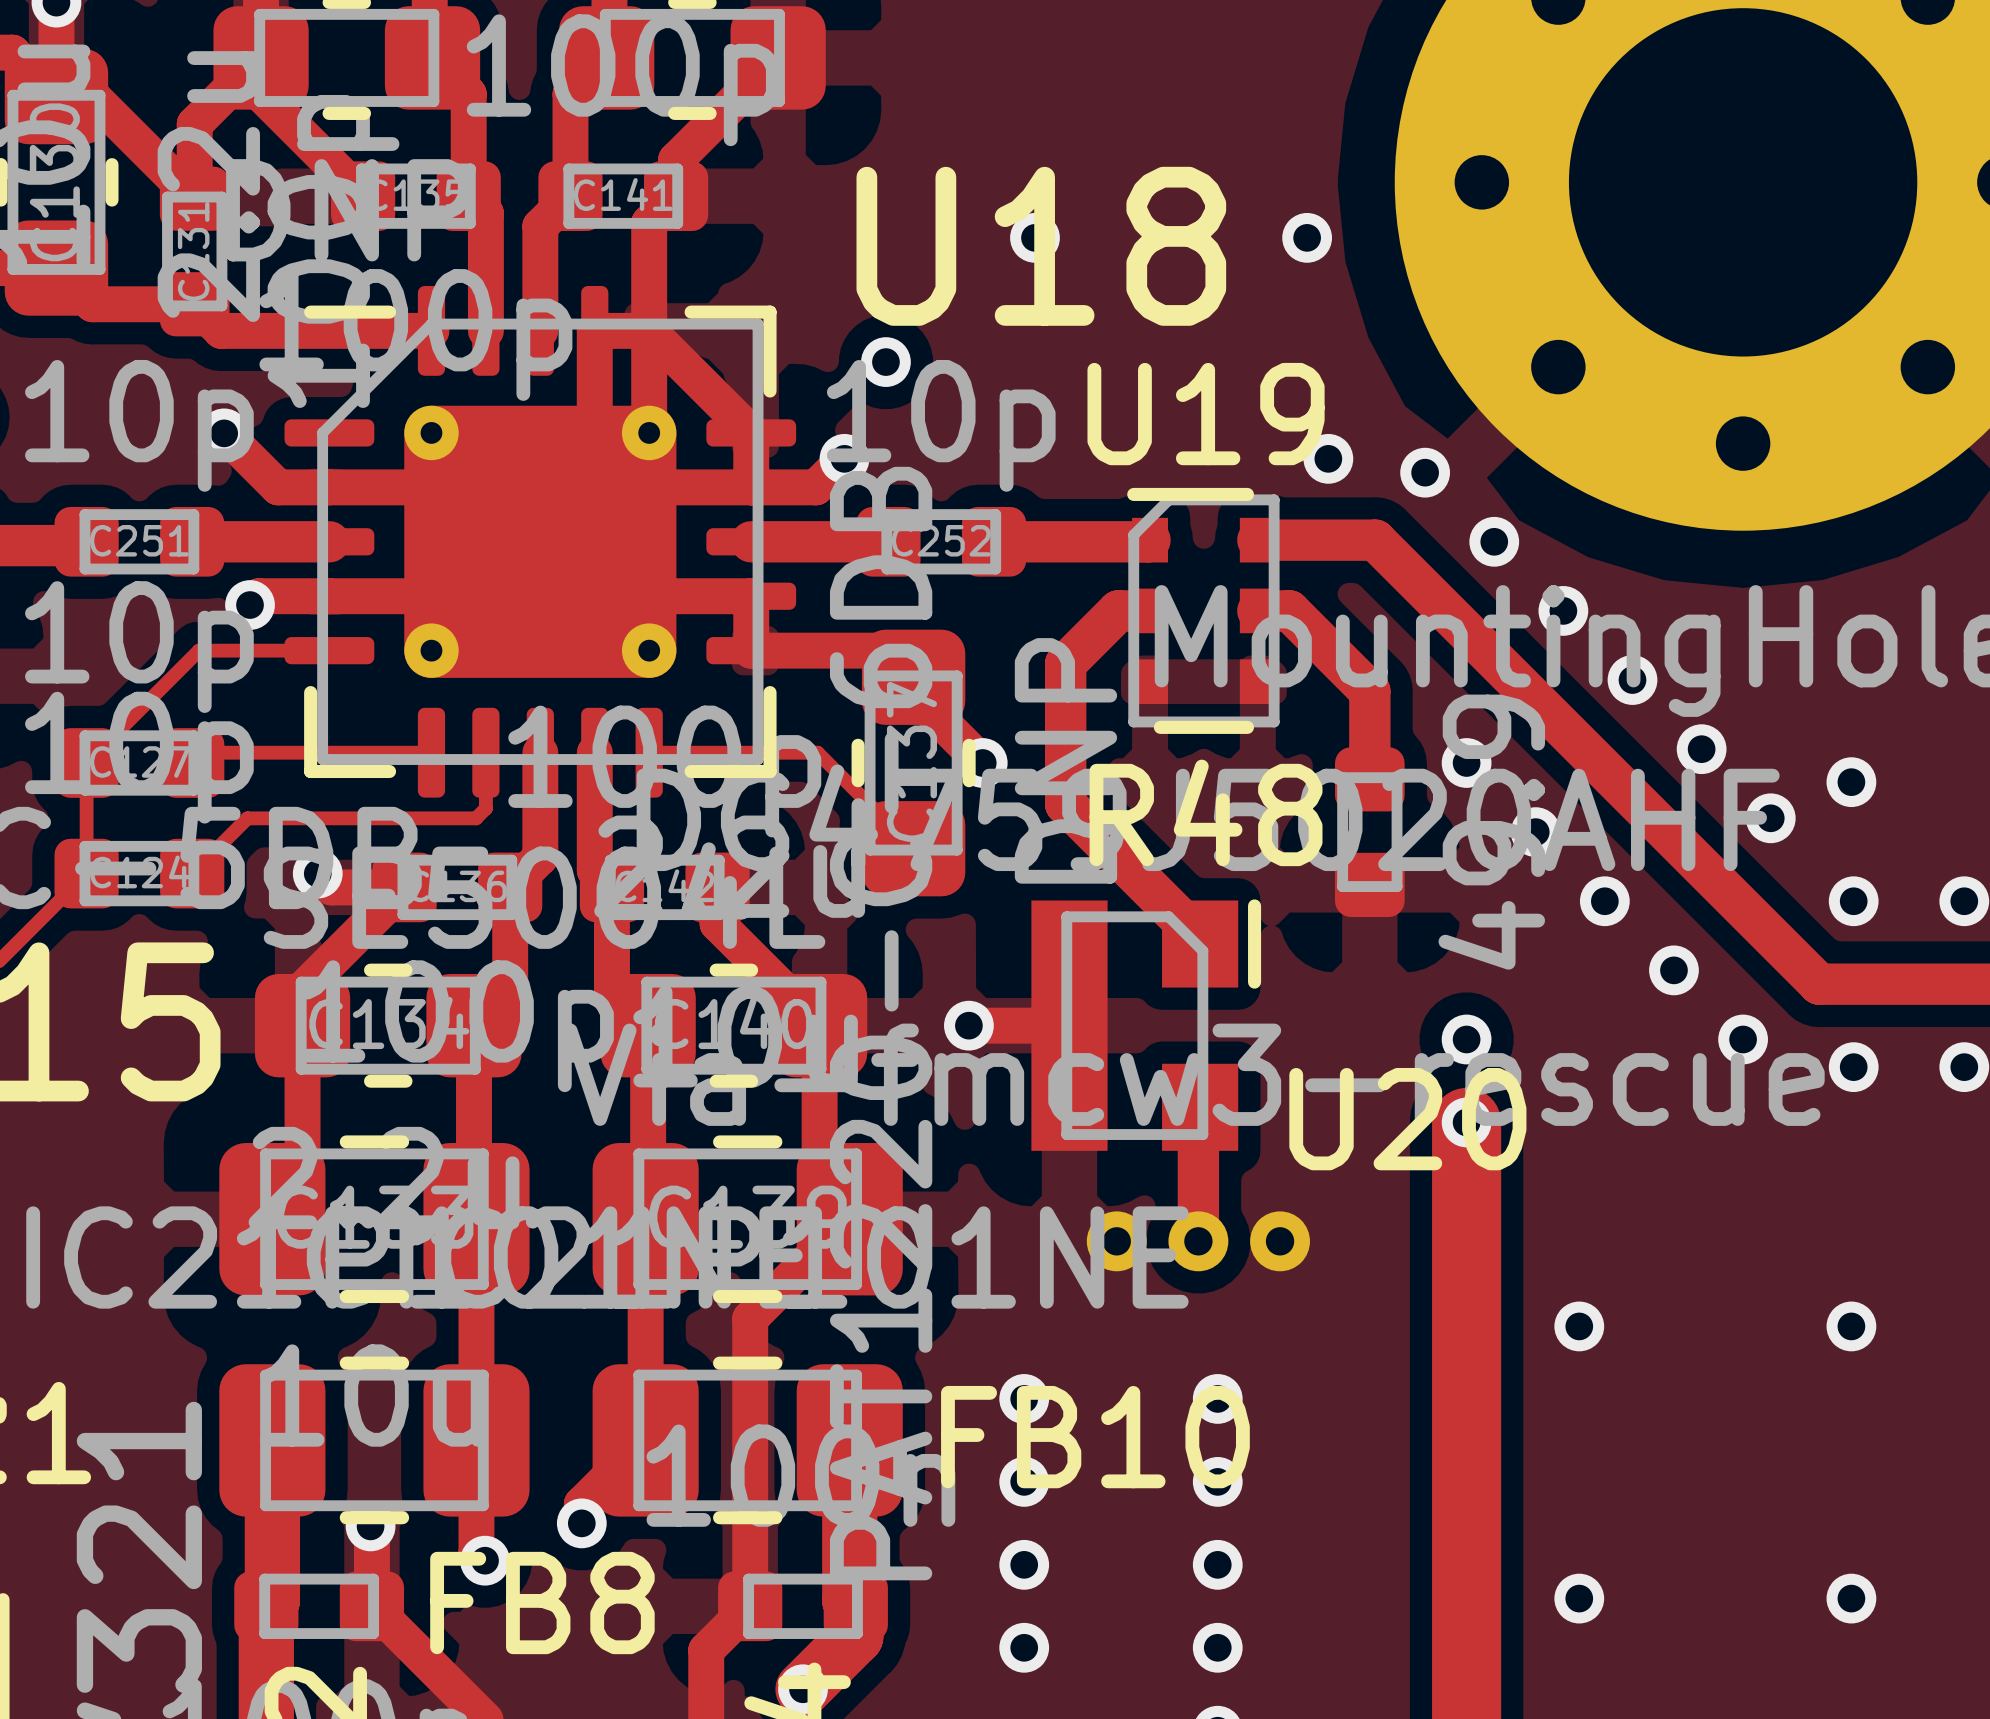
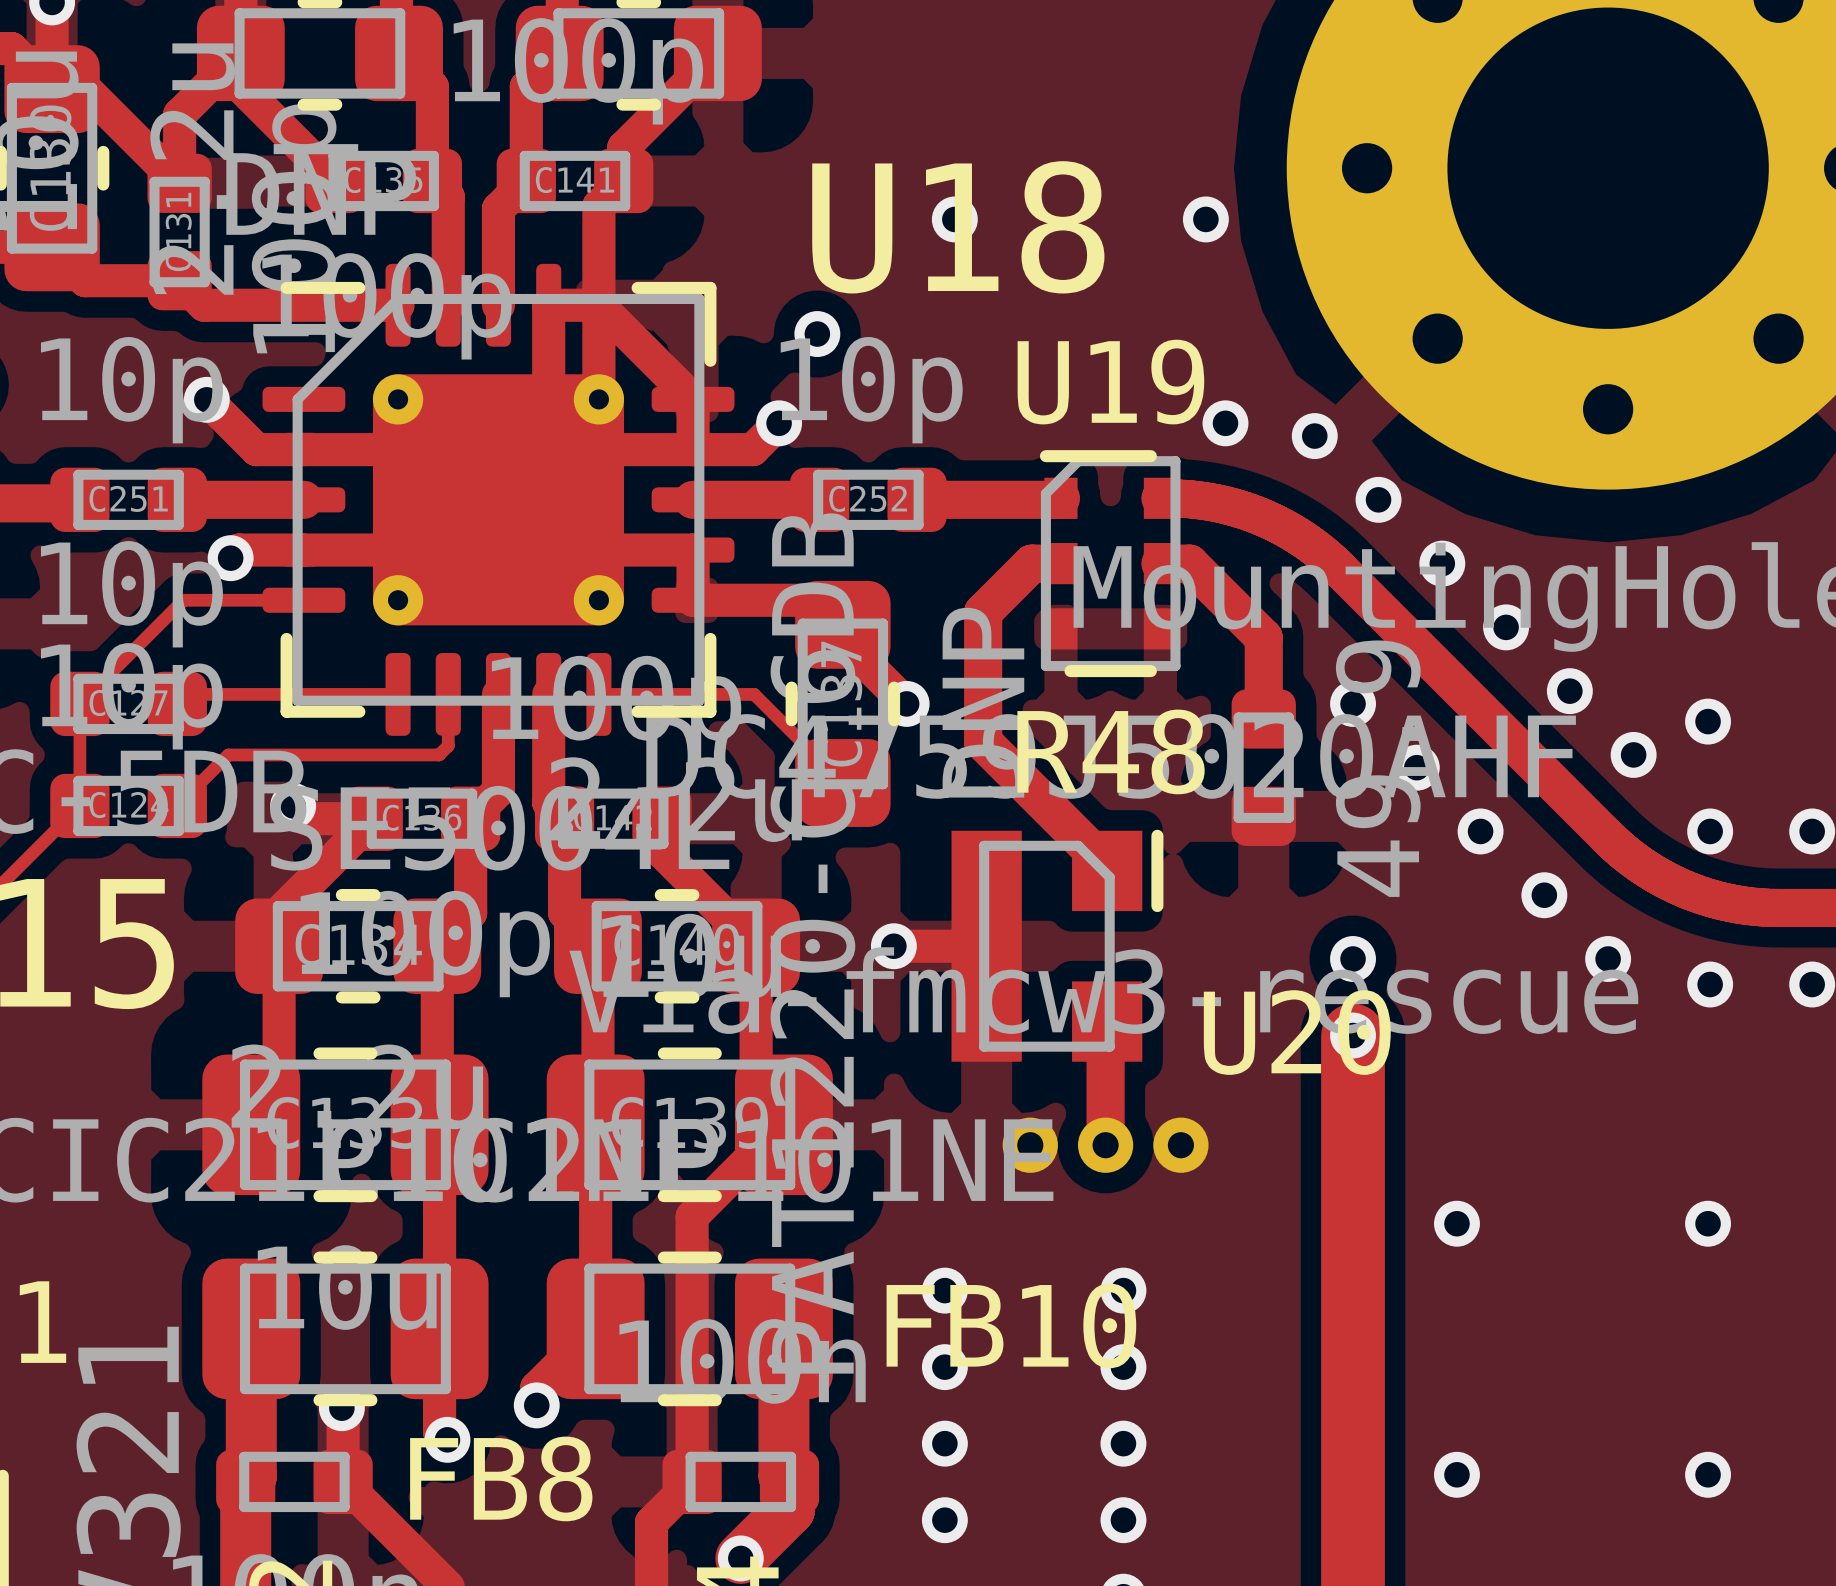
track: (1266, 540) (1375, 540) (1452, 617) -> (1168, 498) (1215, 502) (1261, 516) (1303, 539) (1339, 569)
track: (1742, 907) (1819, 984) (1928, 984) -> (1607, 836) (1644, 867) (1686, 889) (1731, 903) (1778, 907)

